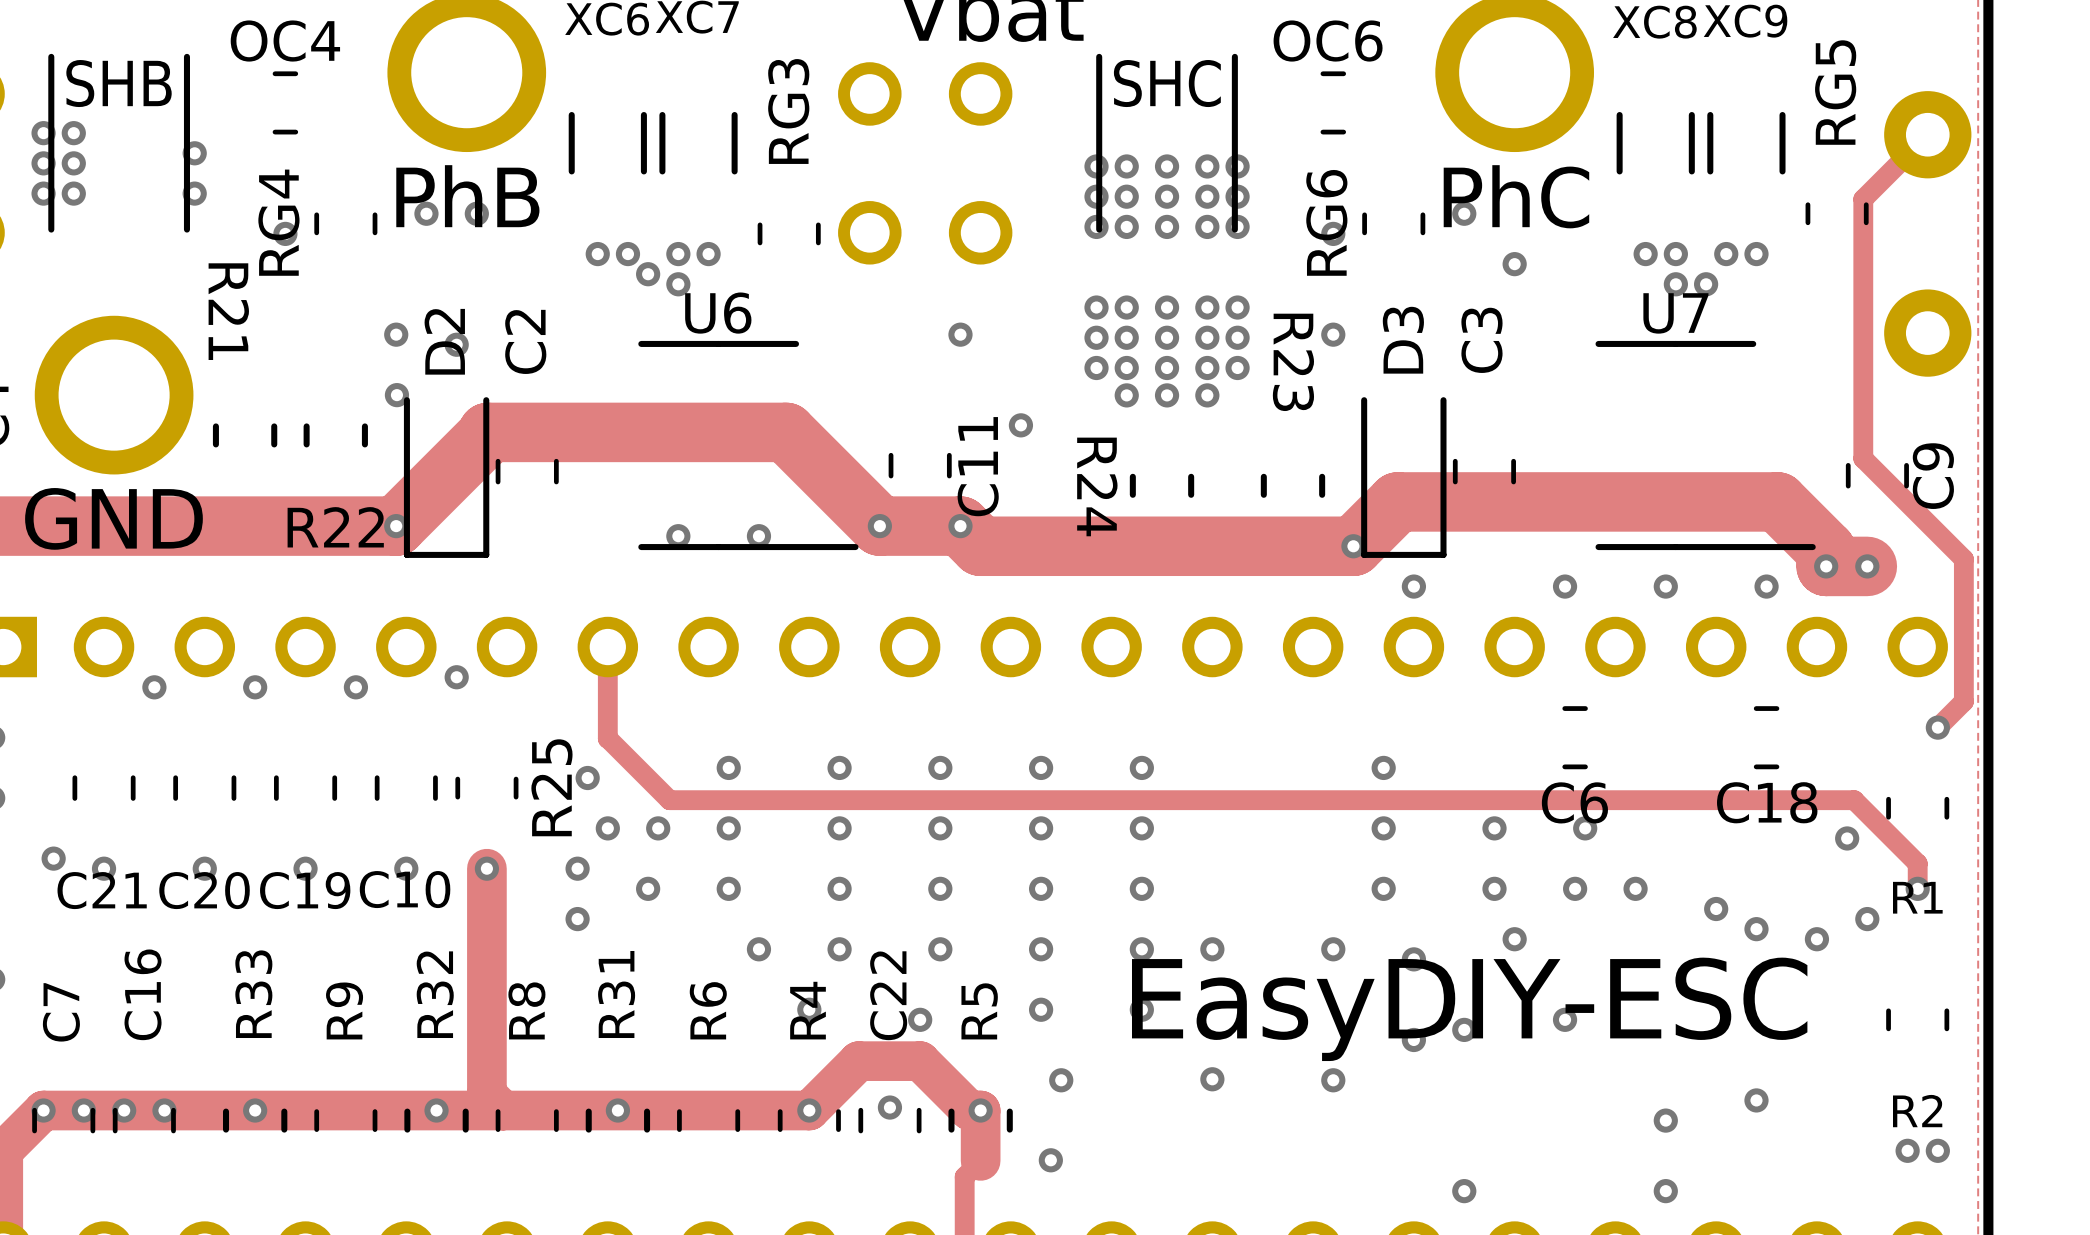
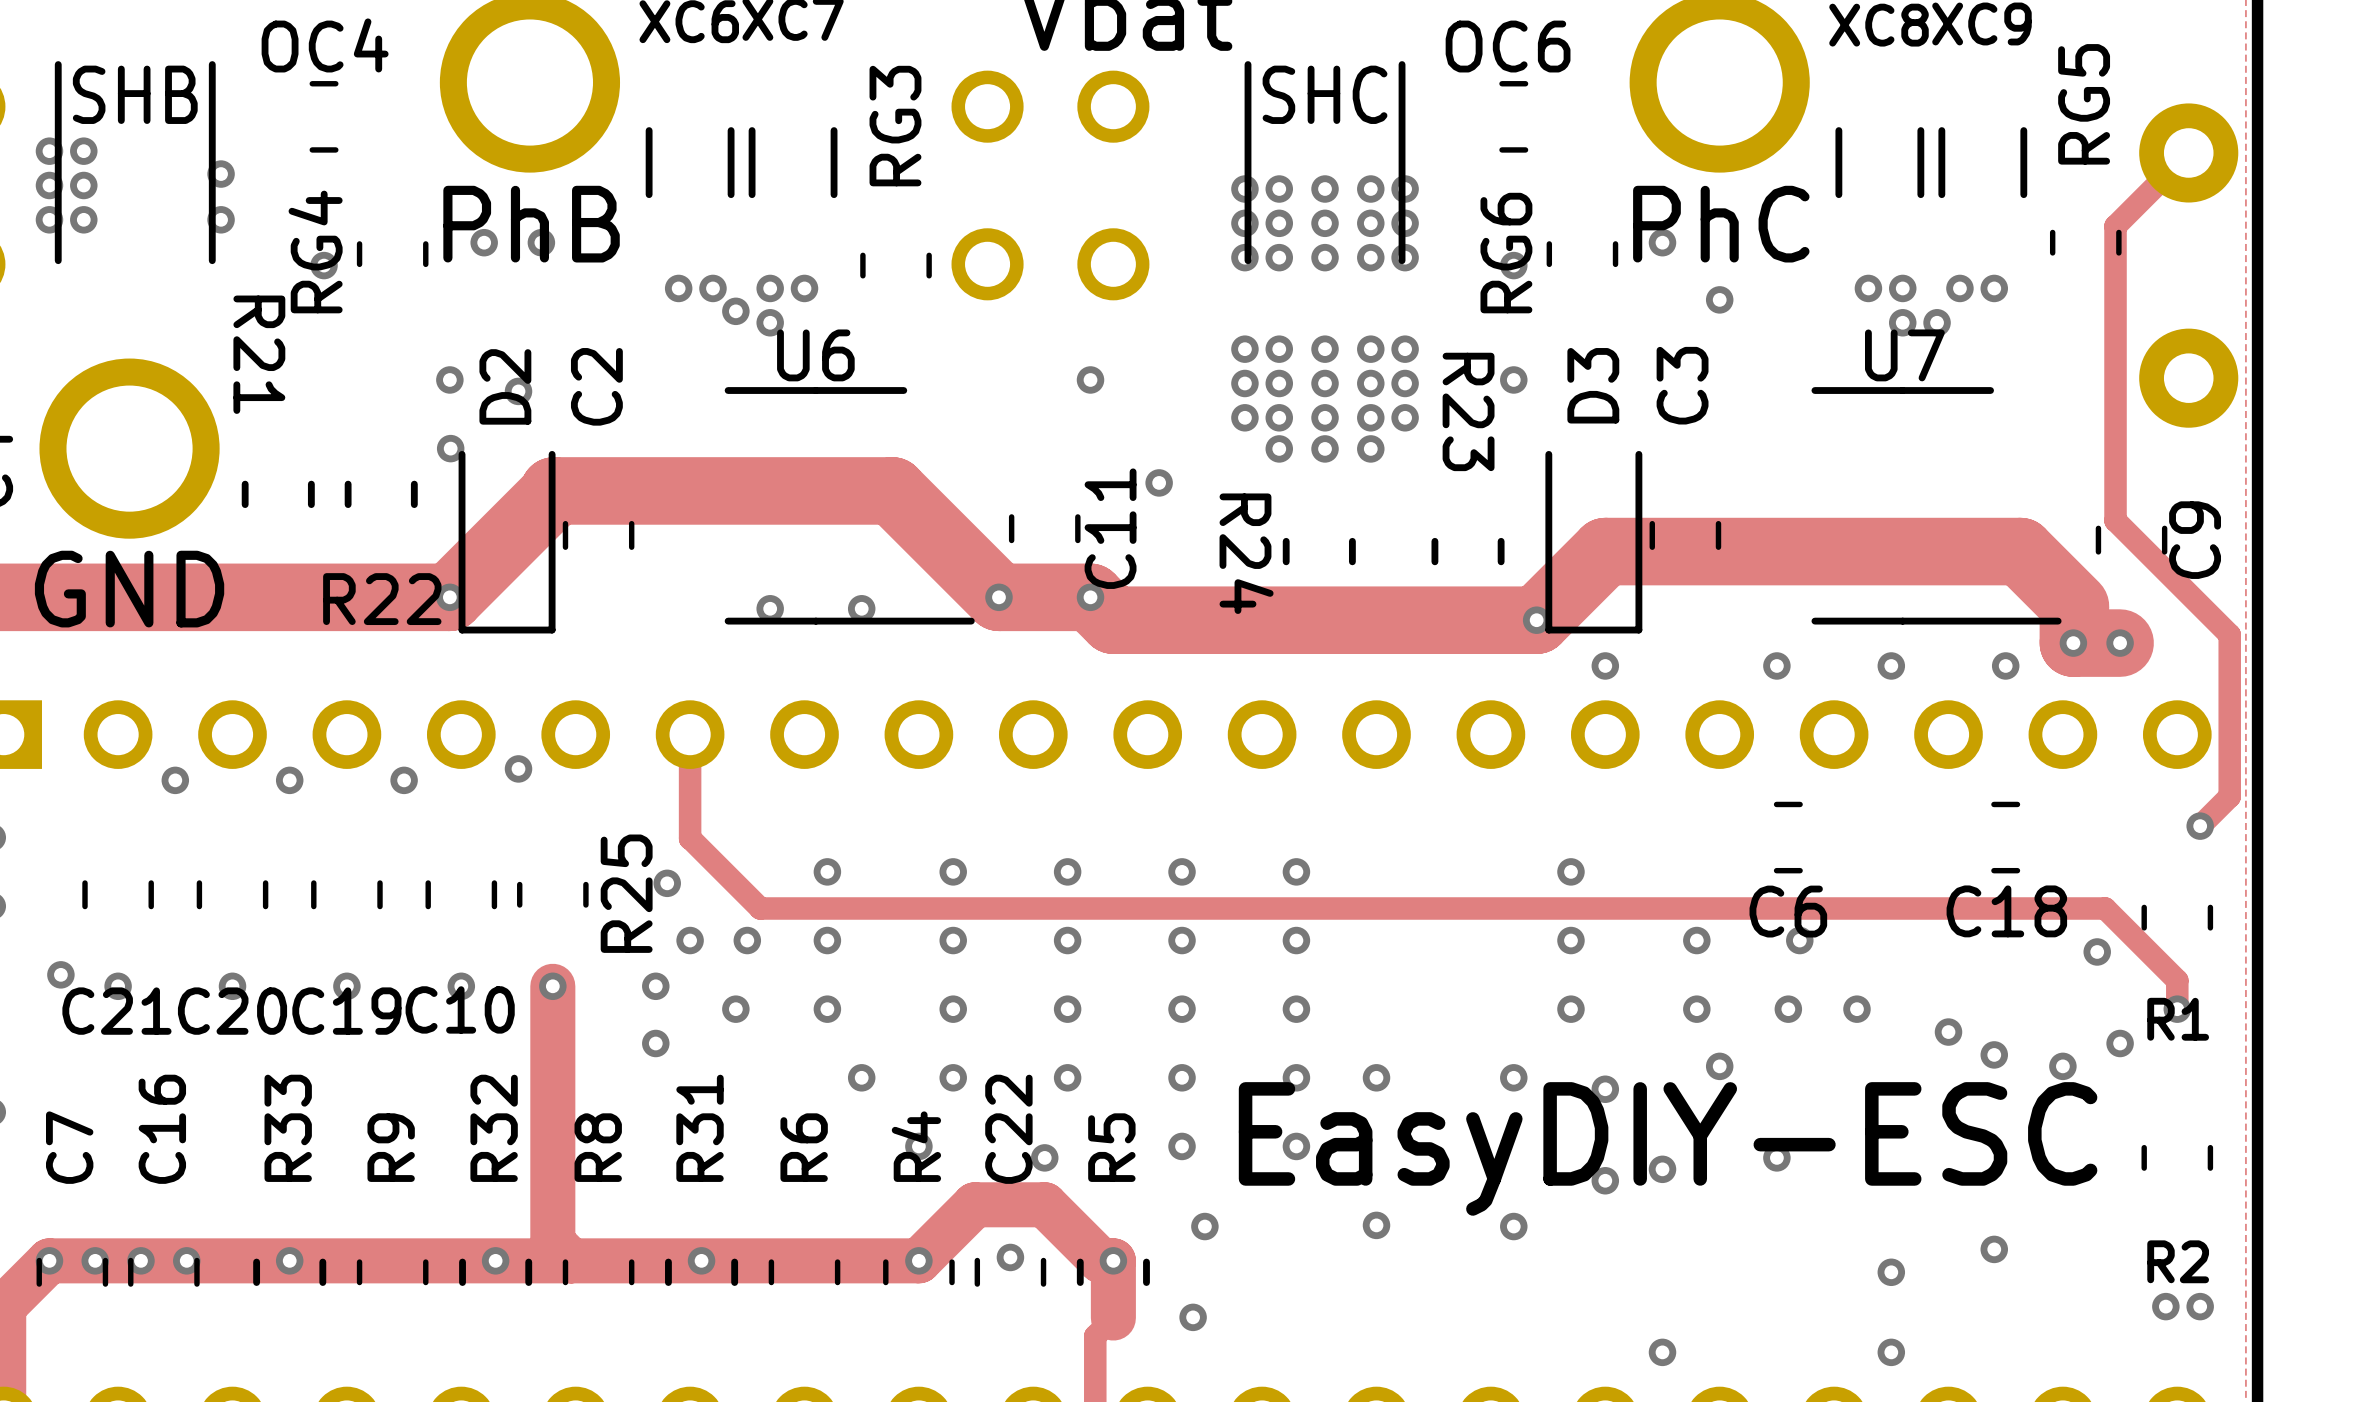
track: (1397, 501) (1777, 501) (1826, 550) -> (1587, 569) (1605, 551) (2020, 551) (2075, 606)

